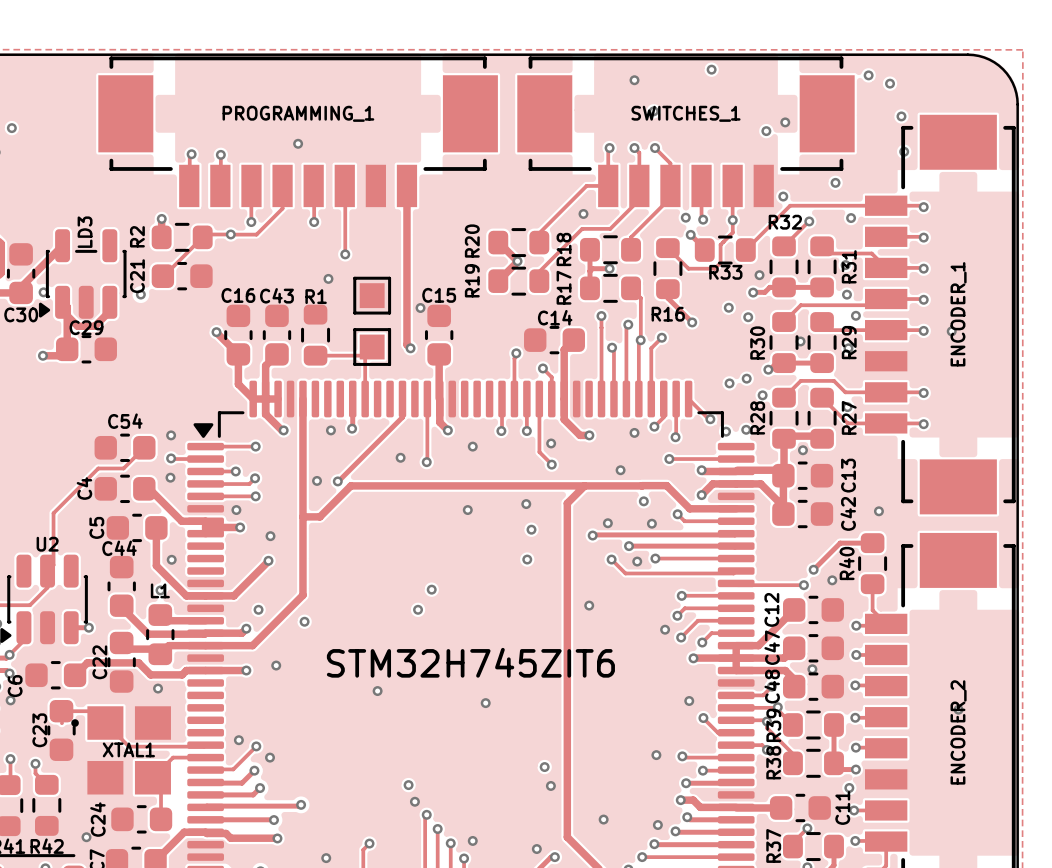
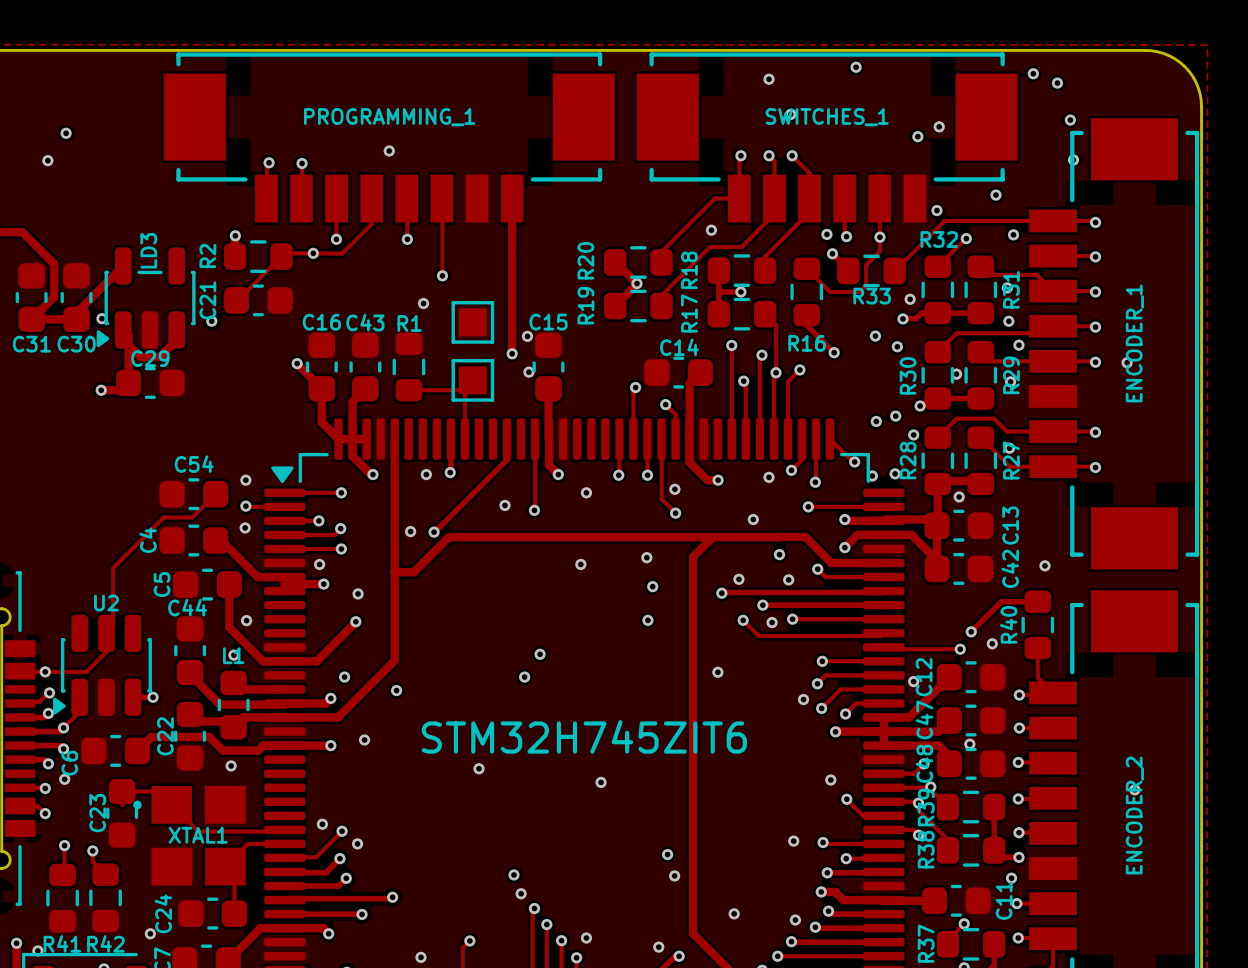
track: (406, 323) (406, 344) (410, 348) -> none
via: none -> (512, 353)
via: none -> (528, 372)
via: (410, 348) -> none
via: none -> (913, 681)
track: (205, 832) (226, 833) (230, 838) (277, 838) -> (284, 928) (323, 928) (328, 933)
via position: (277, 838) -> (328, 933)

